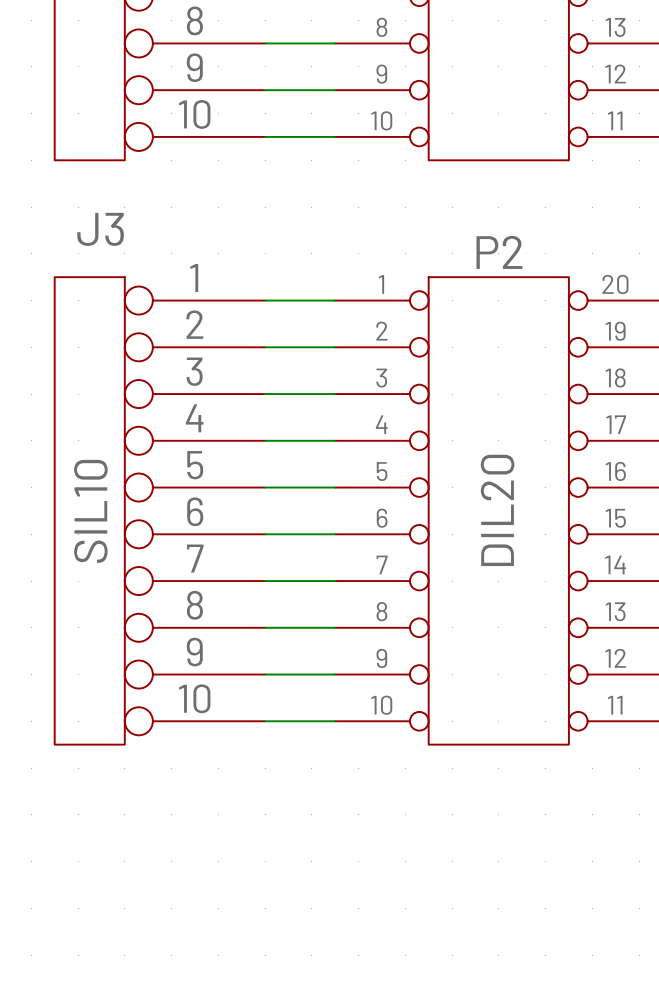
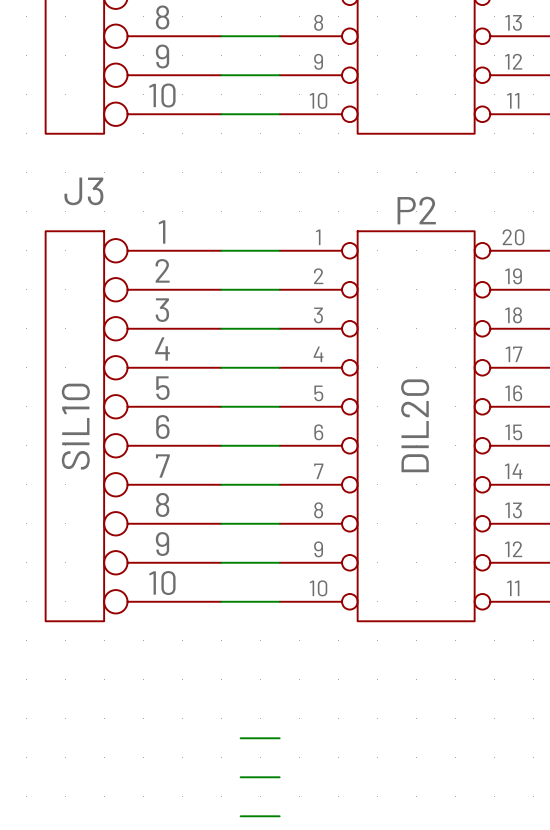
wire: none -> (240, 738) (279, 738)
wire: none -> (240, 777) (279, 777)
wire: none -> (240, 816) (279, 816)

